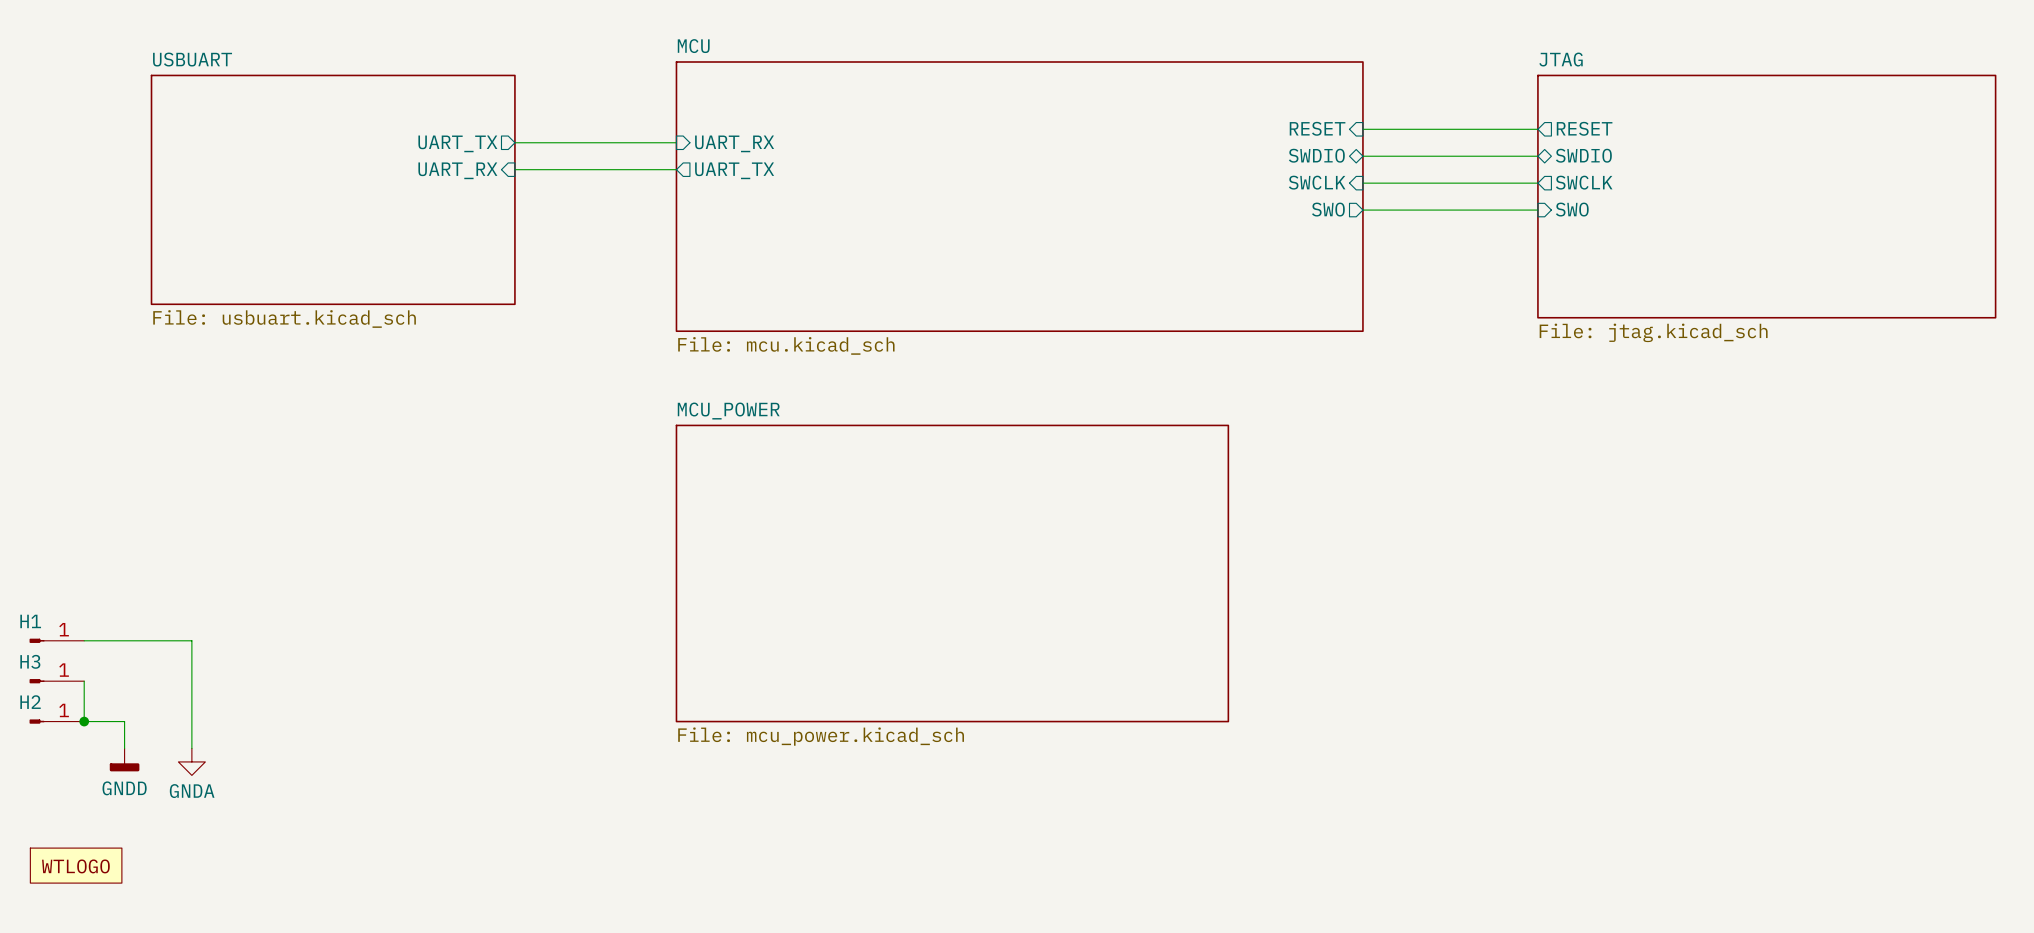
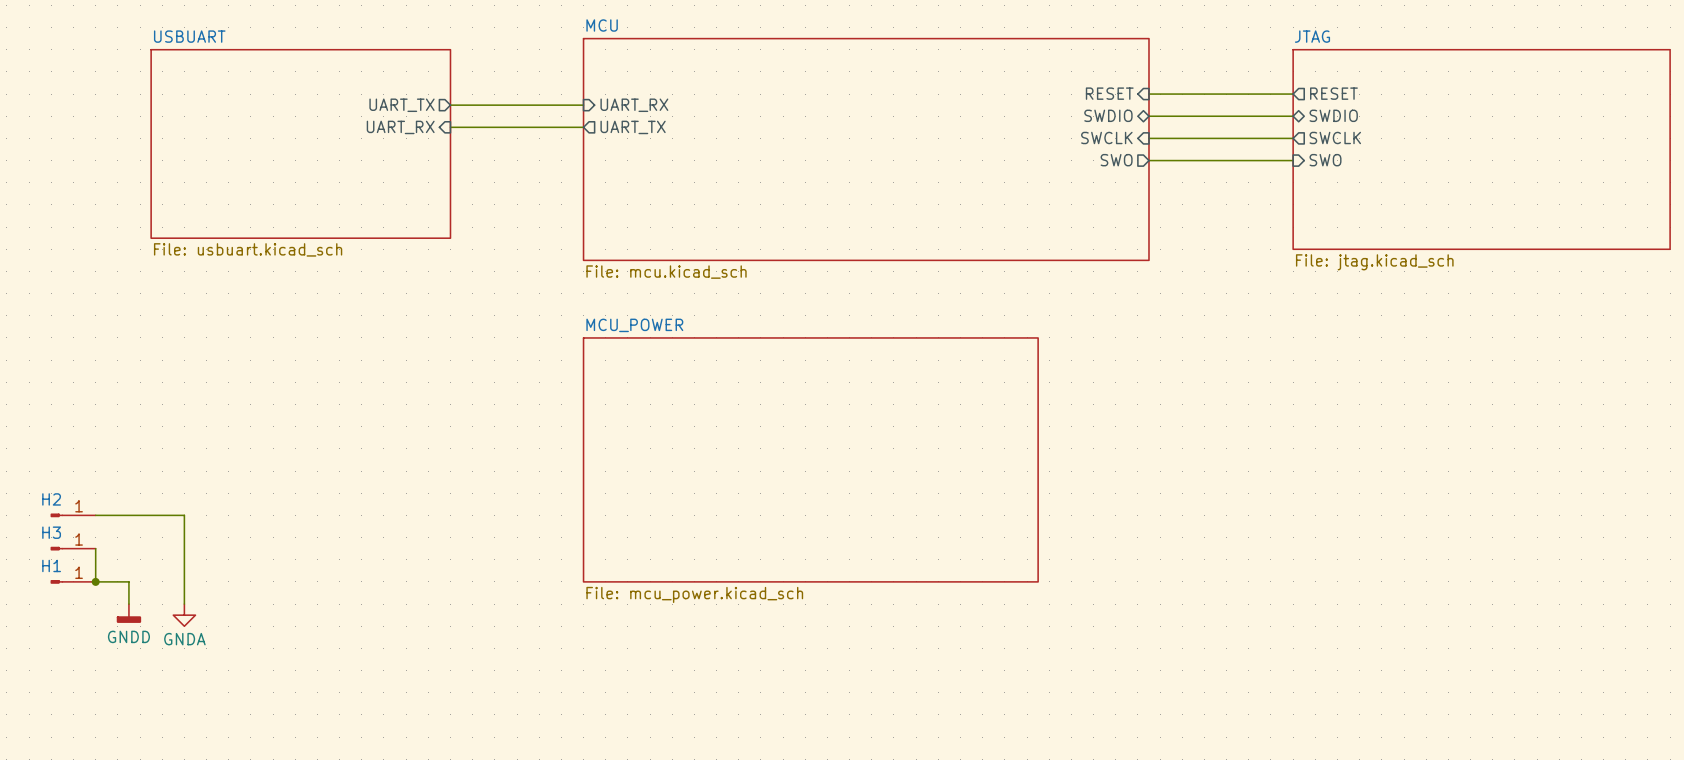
H1 name: H1 (30, 621) -> H2 (51, 499)
H2 name: H2 (30, 702) -> H1 (51, 565)
part: (76, 865) -> none

